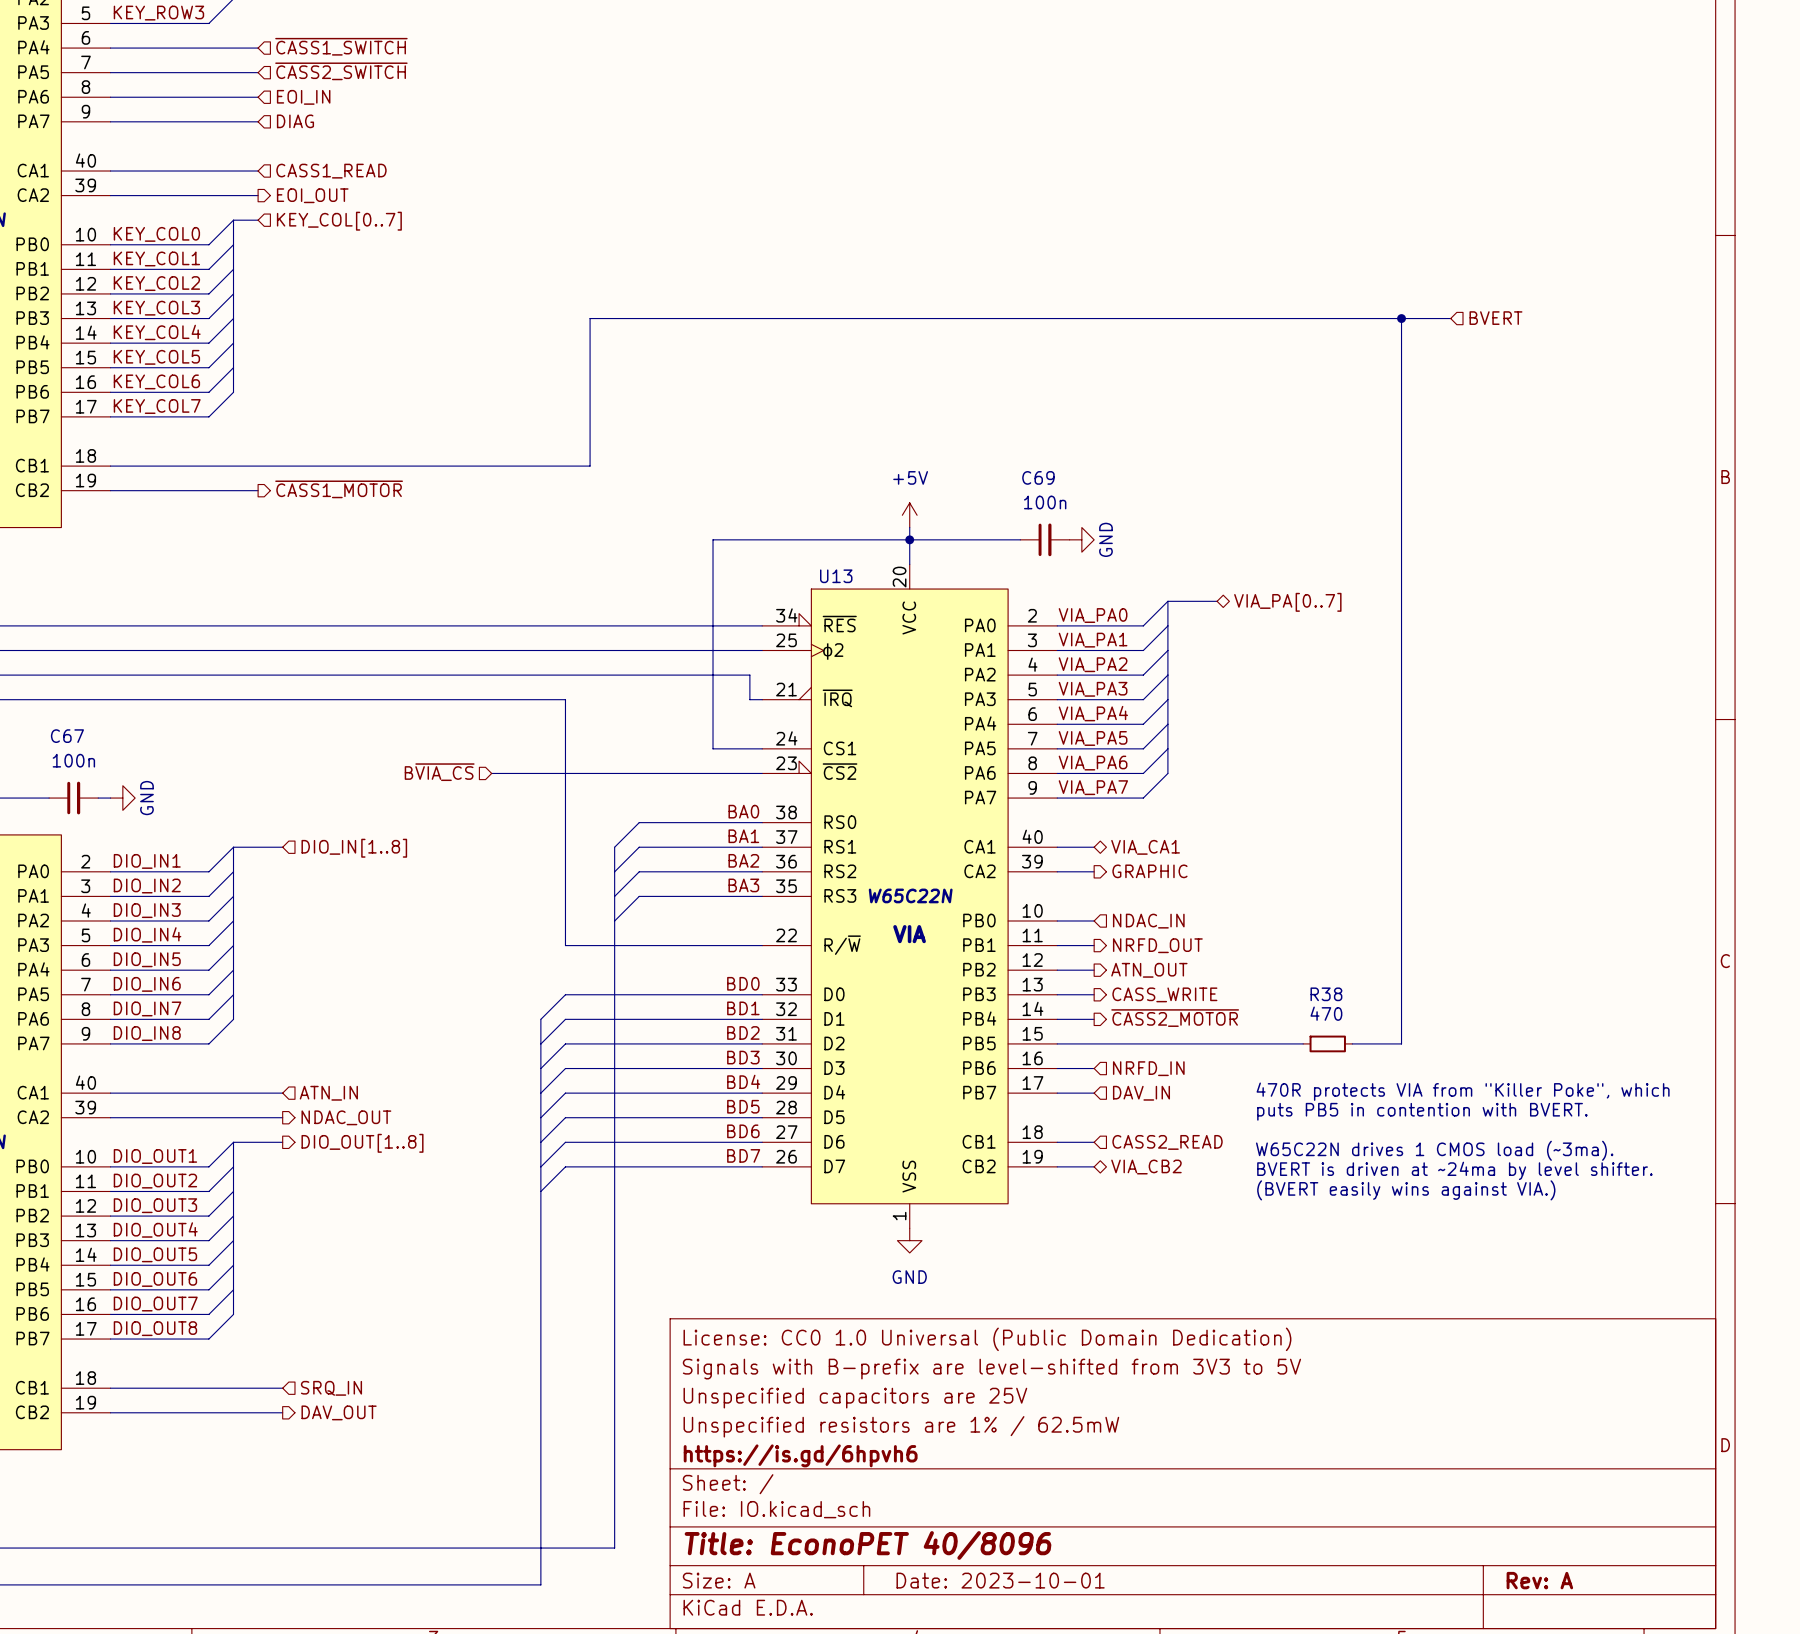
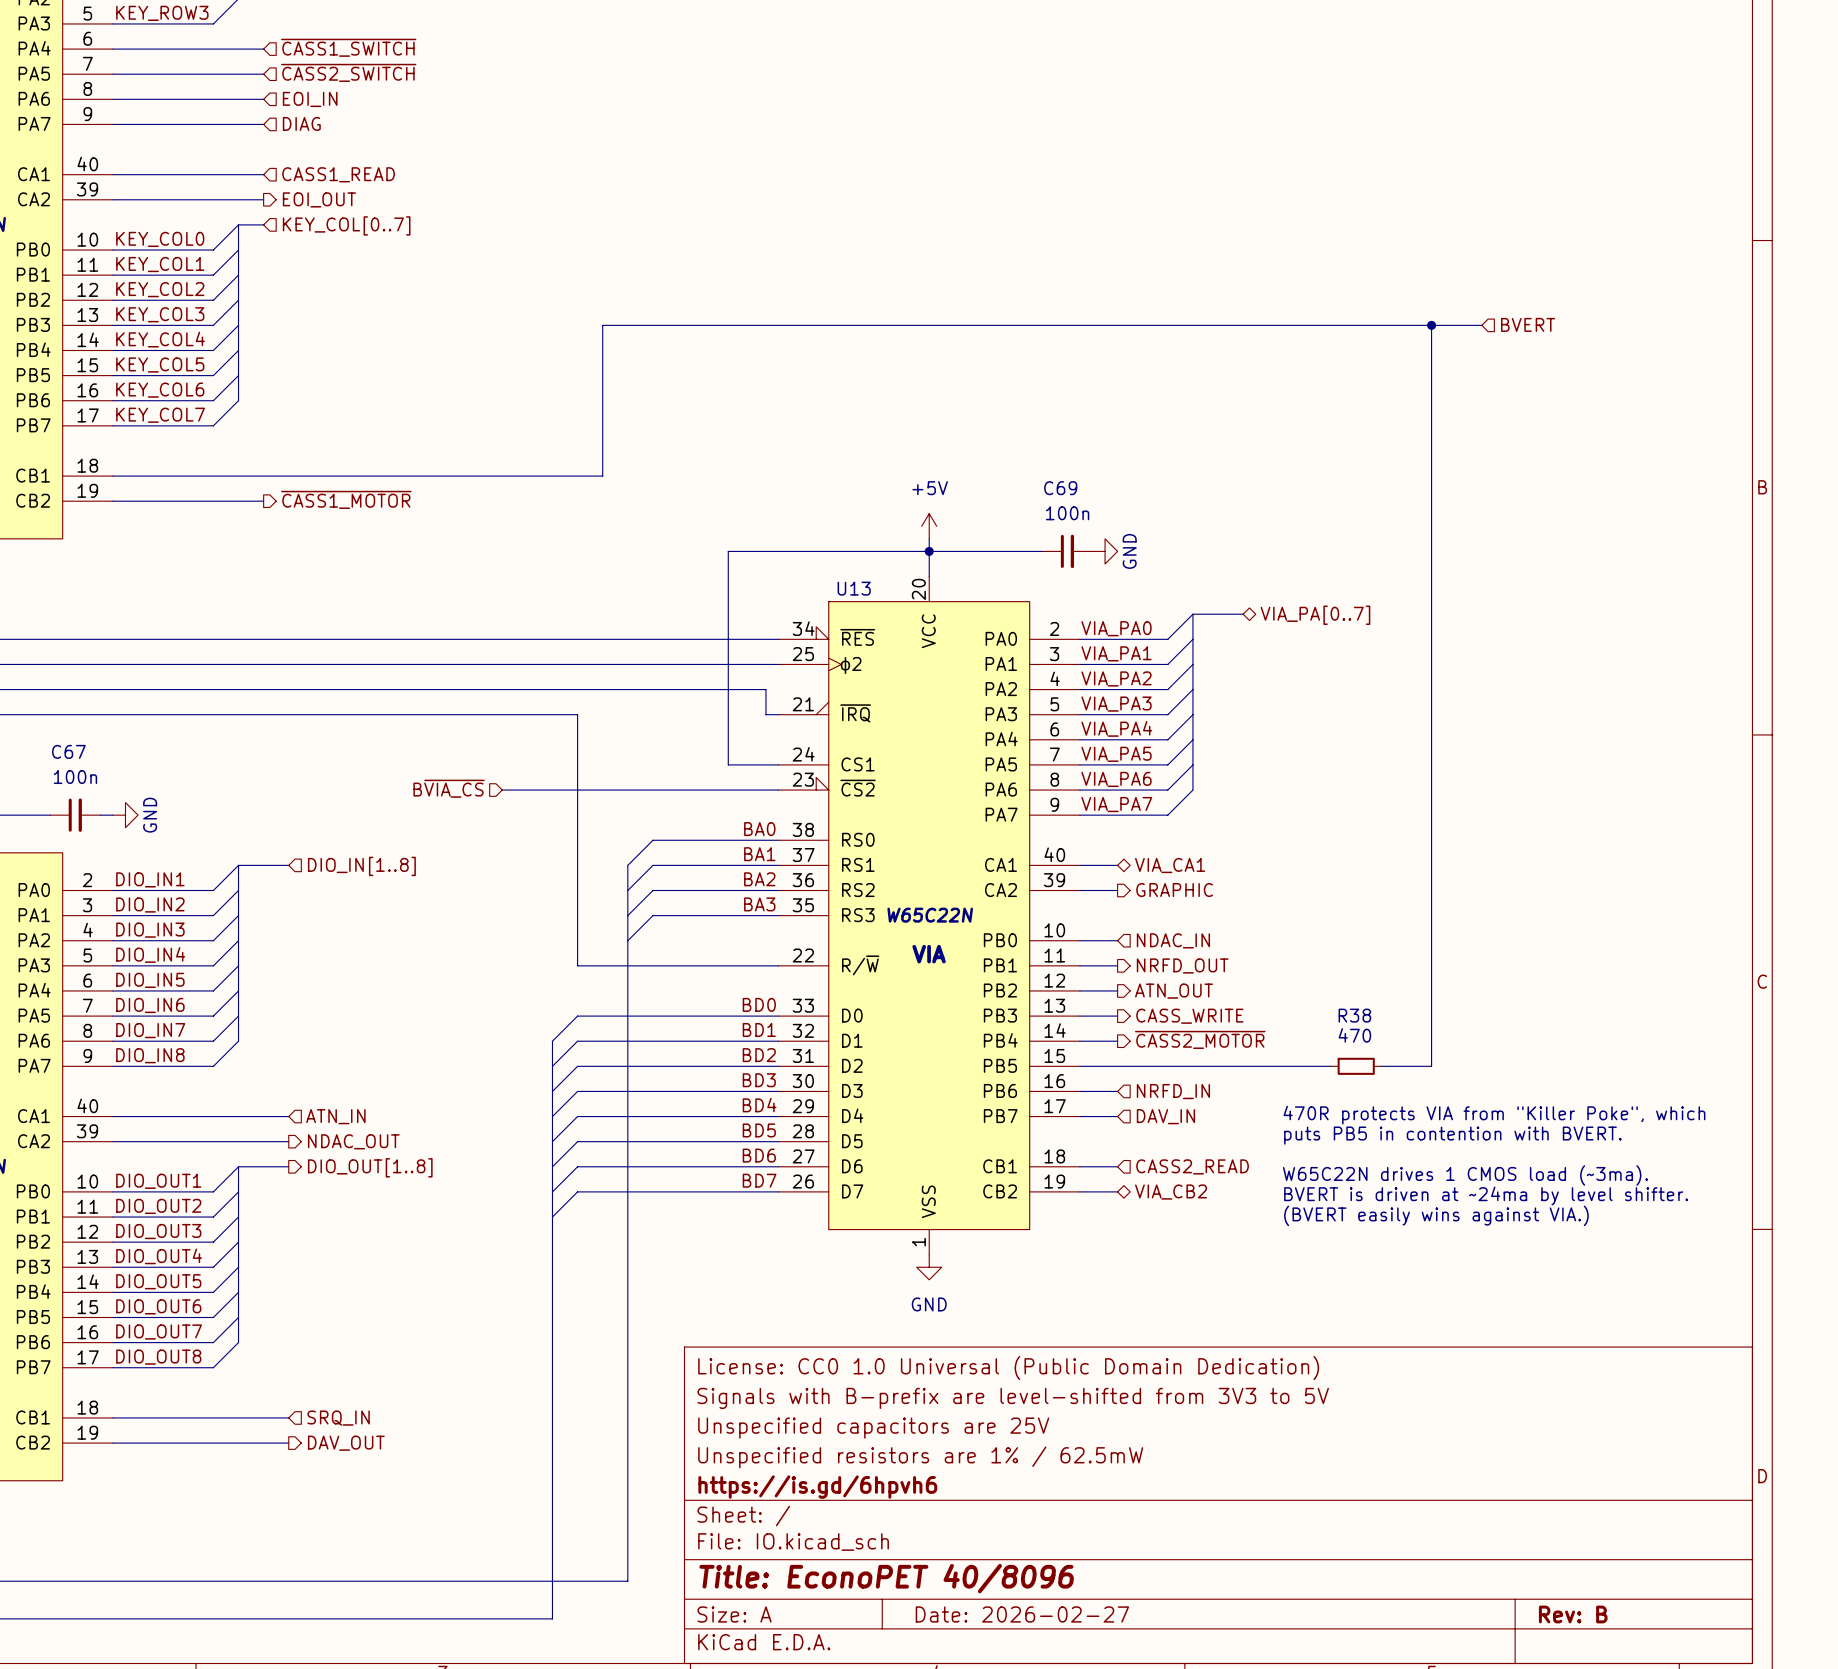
title block: Date: 2023-10-01 (1000, 1580) -> Date: 2026-02-27 (1022, 1614)
title block: Rev: A (1539, 1580) -> Rev: B (1573, 1614)

